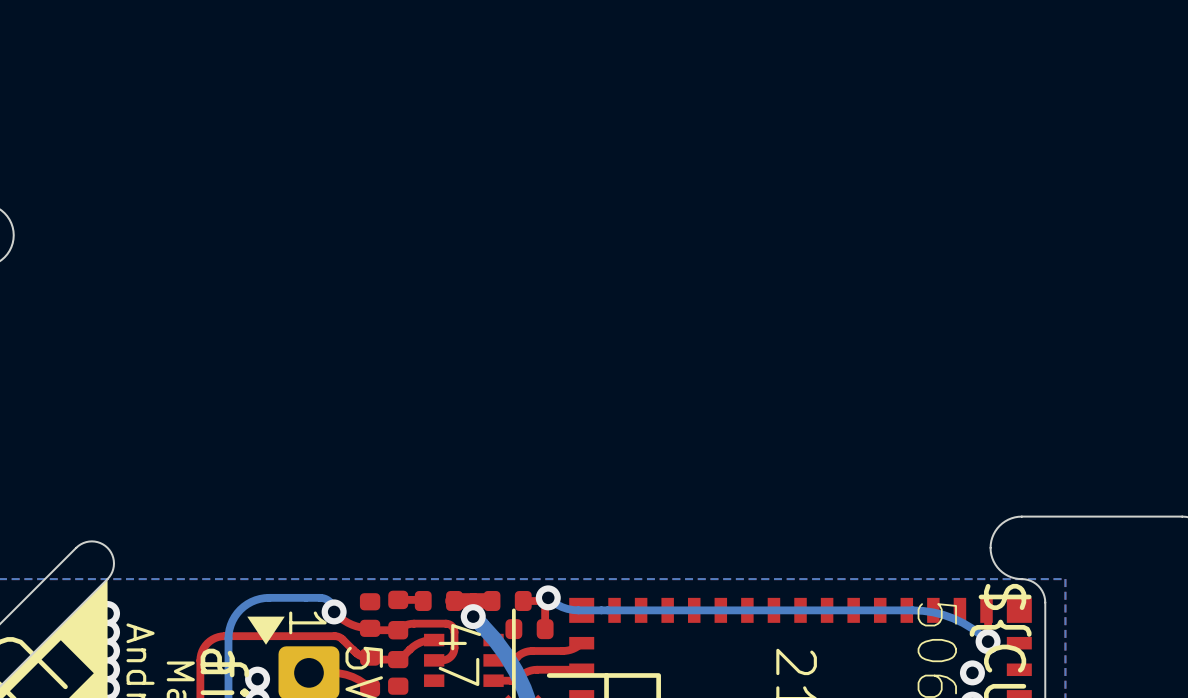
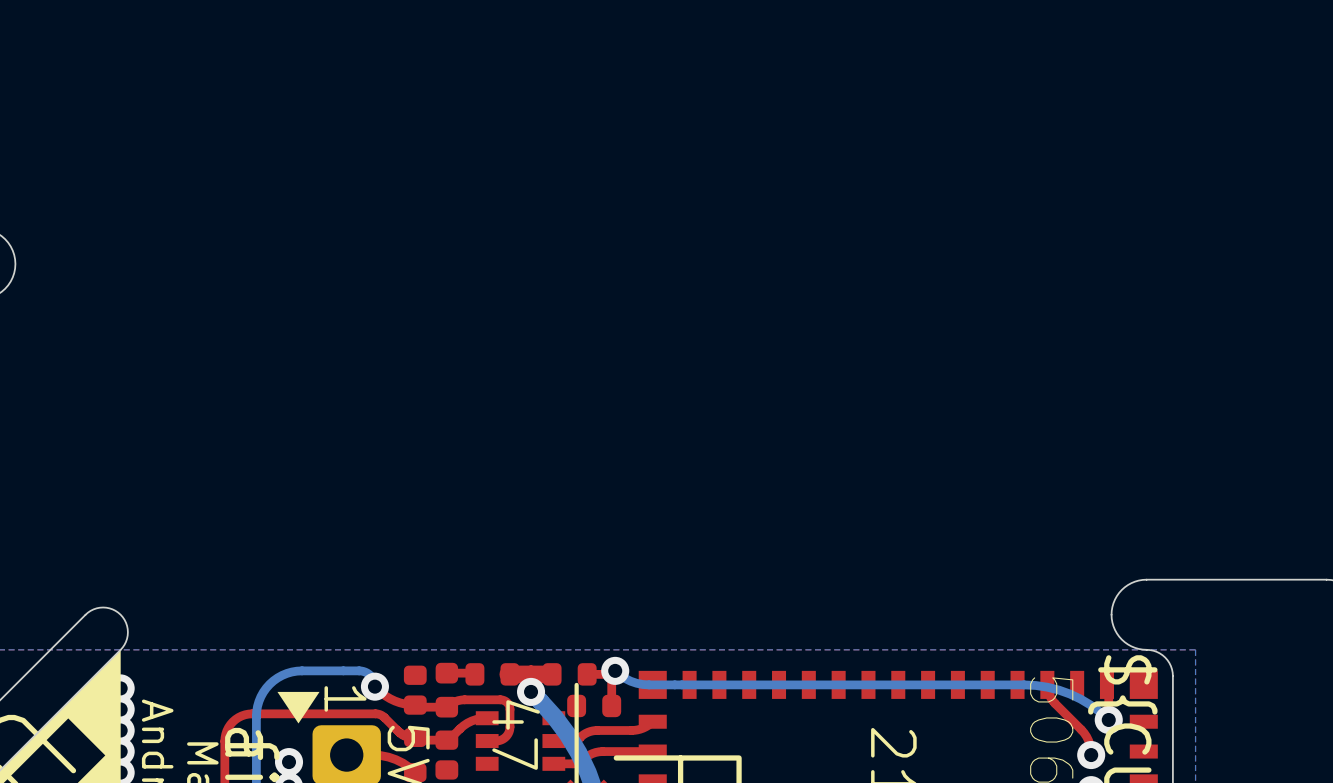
top track: none -> (1047, 684) (1049, 694) (1053, 701) (1086, 736) (1091, 755)

